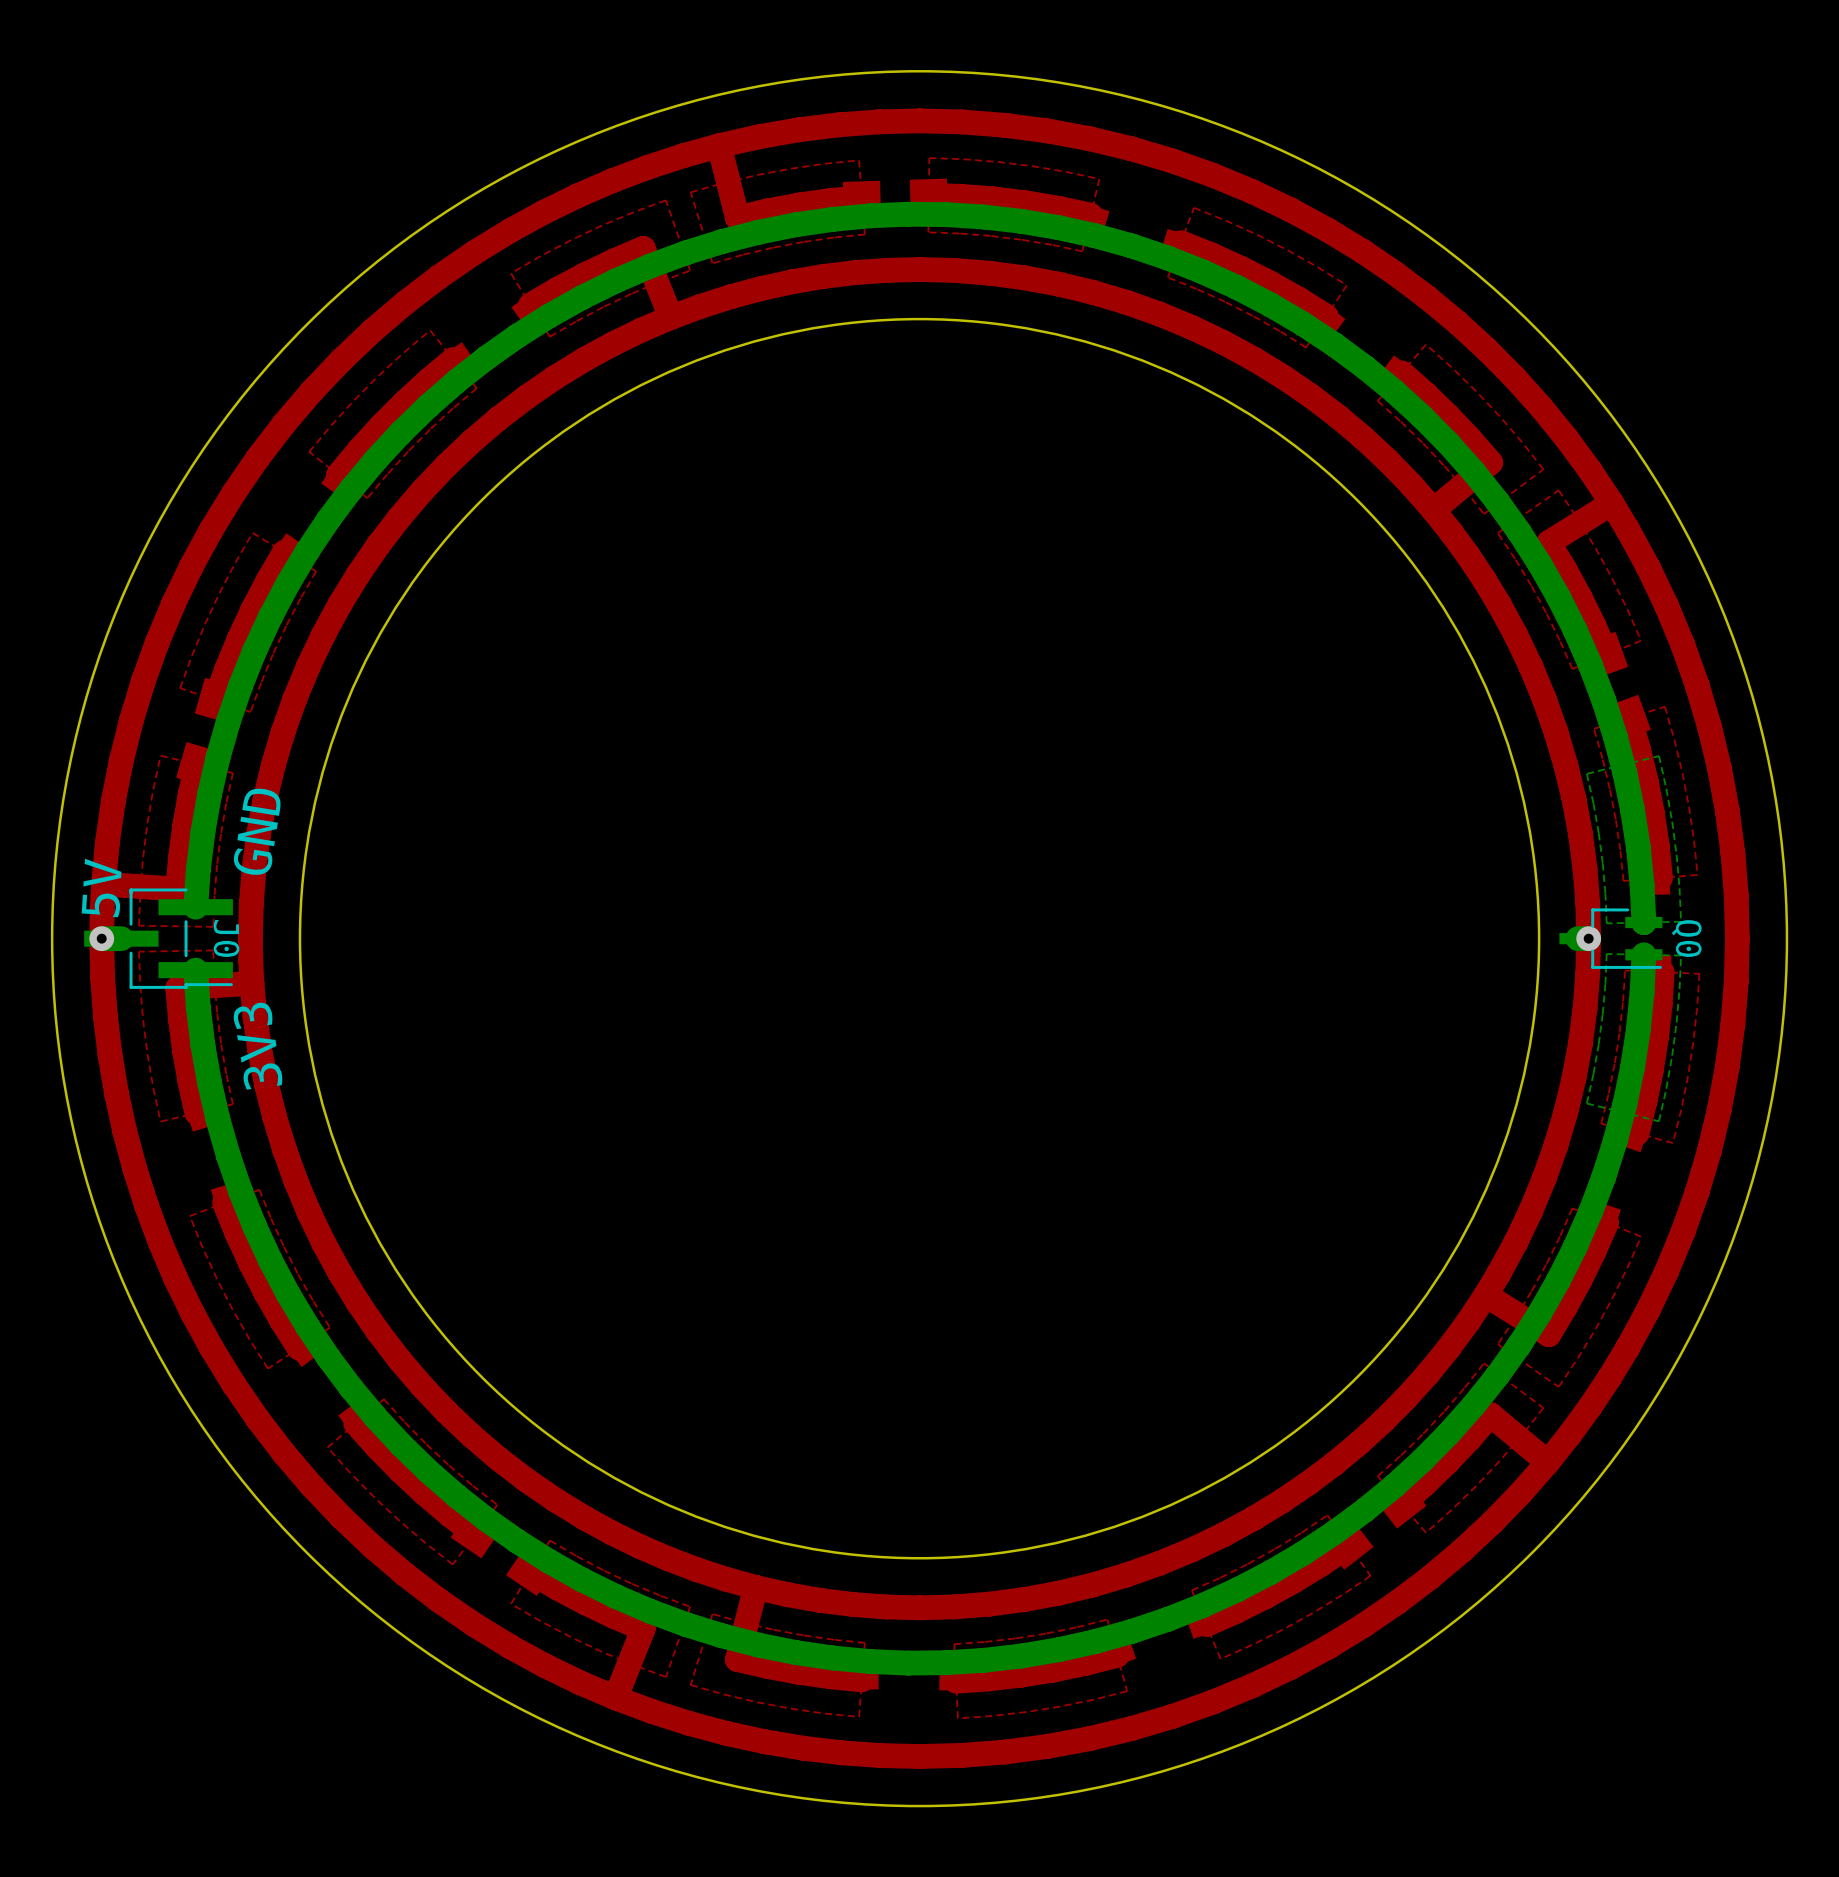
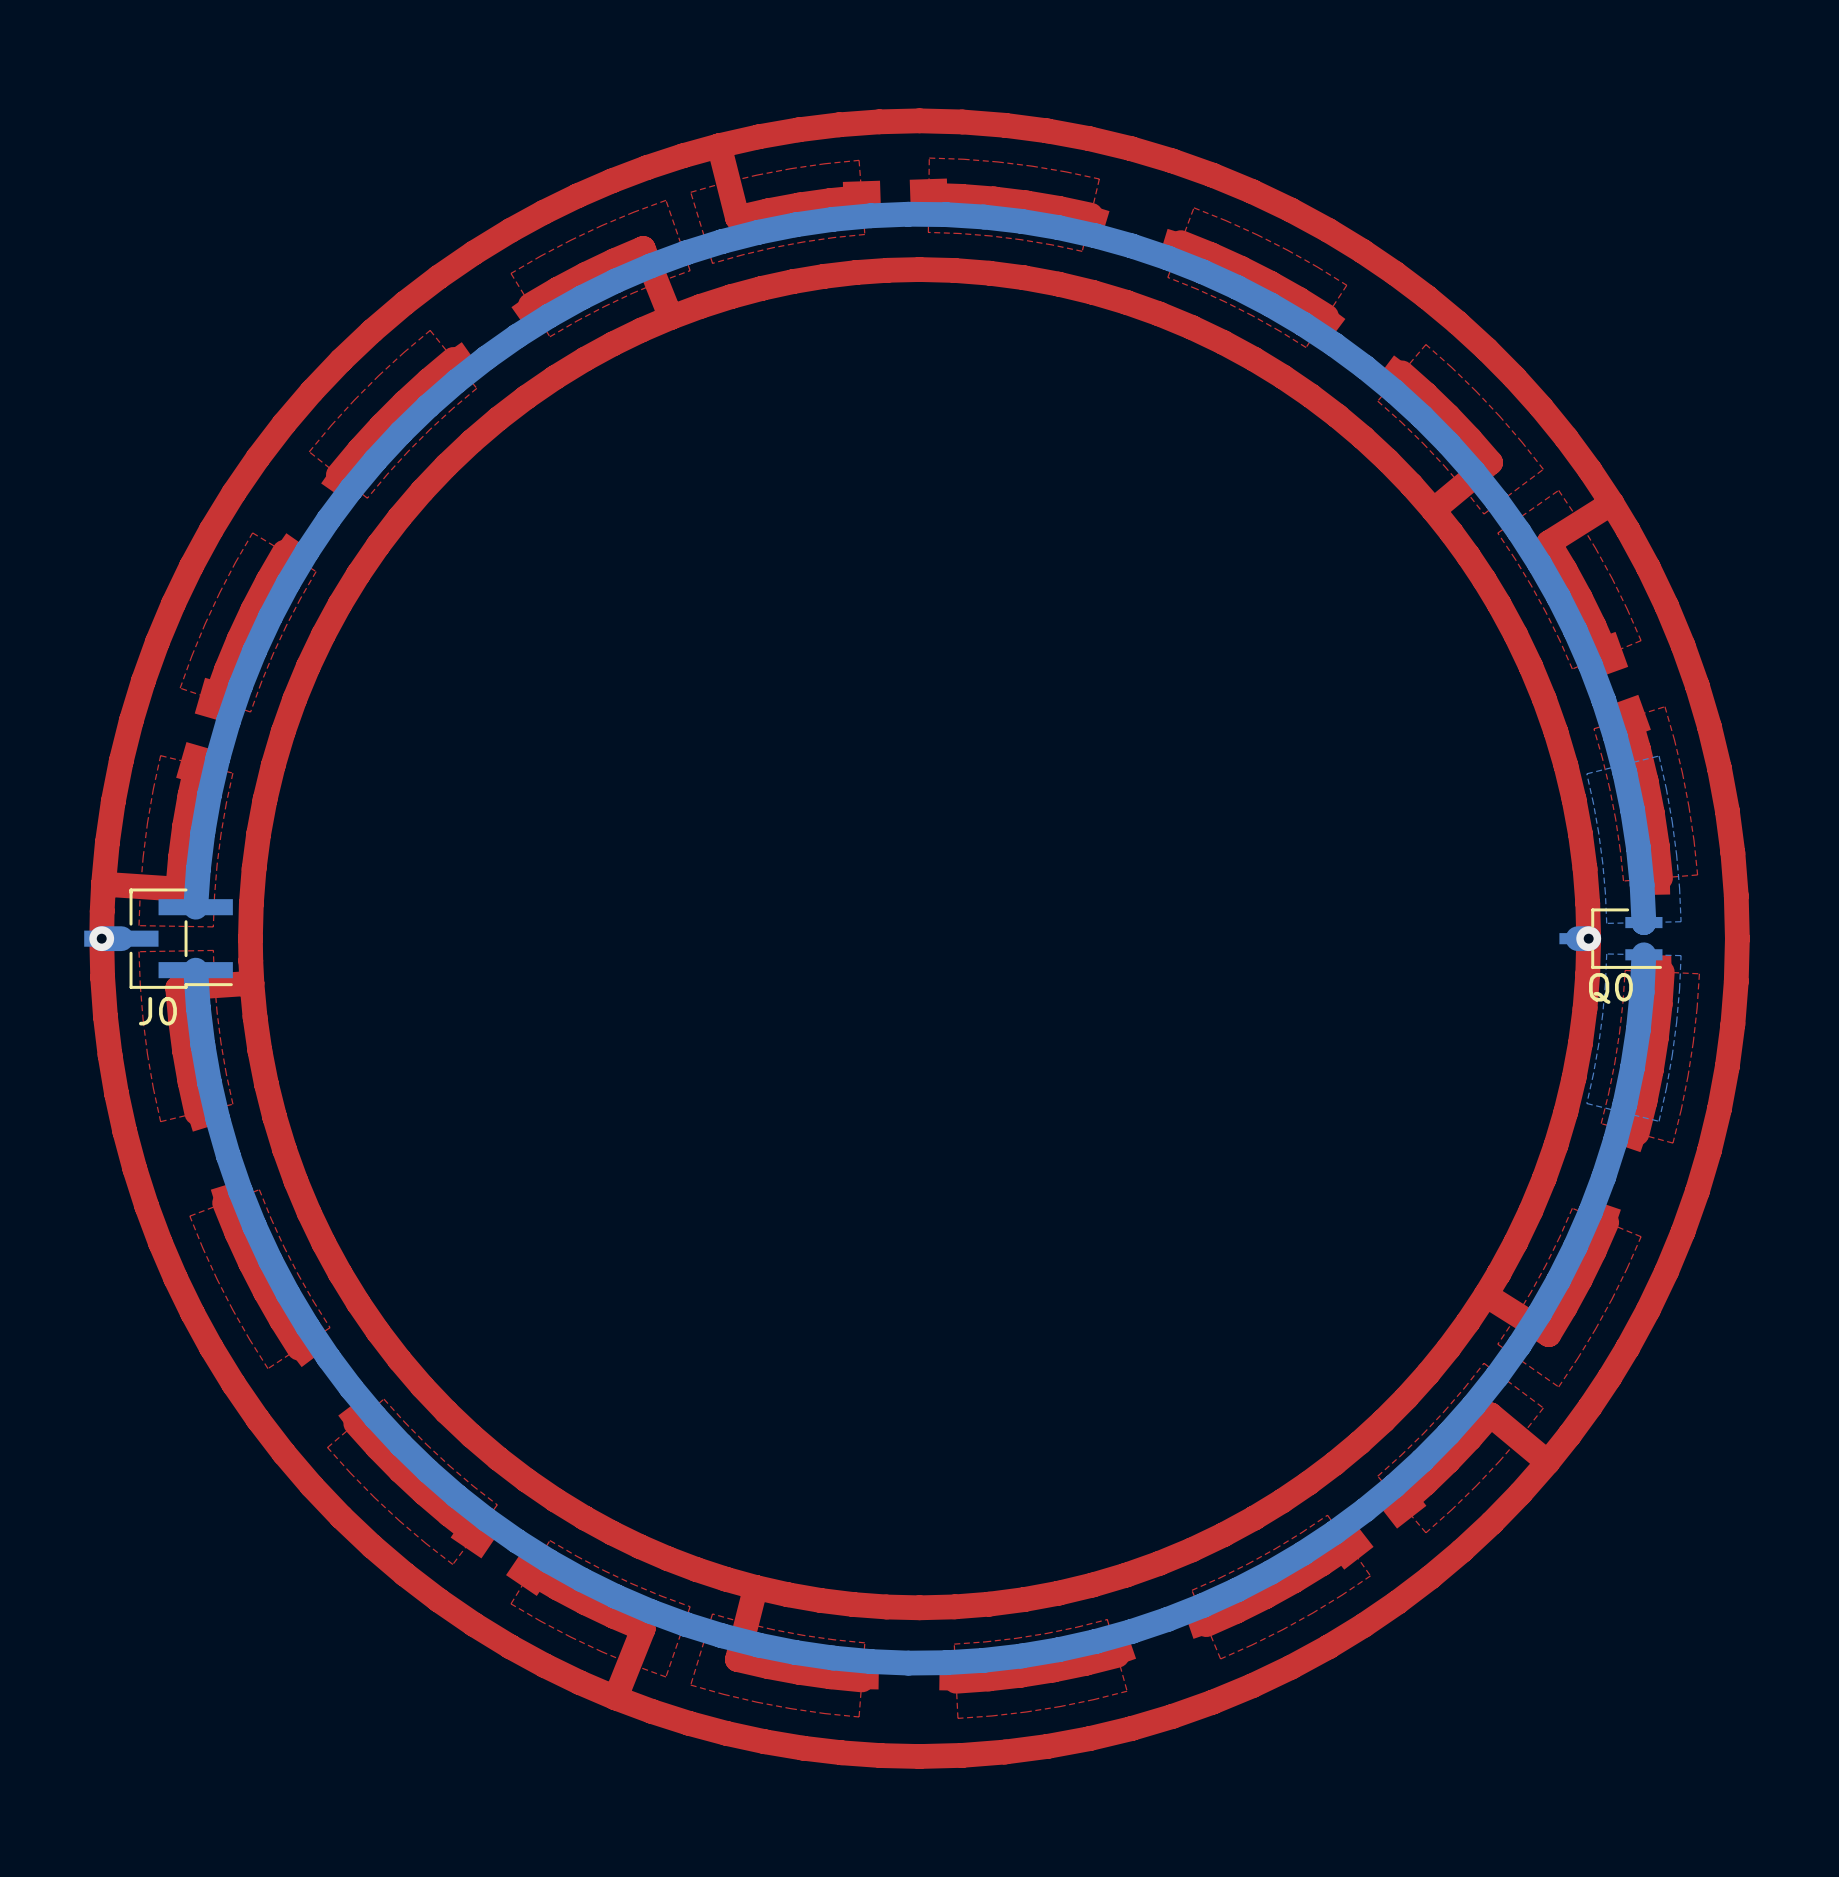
round board edge: [50, 70, 1789, 1808] -> none
round board edge: [298, 317, 1541, 1560] -> none
text: GND (257, 831) -> none
text: 5V (101, 888) -> none
J0 name rotation: 0° (226, 938) -> 90° counterclockwise (157, 1011)
J0 name position: J0 (226, 938) -> J0 (157, 1011)
Q0 name rotation: 0° (1686, 938) -> 90° counterclockwise (1610, 988)
Q0 name position: Q0 (1686, 938) -> Q0 (1610, 988)
text: 3V3 (257, 1045) -> none

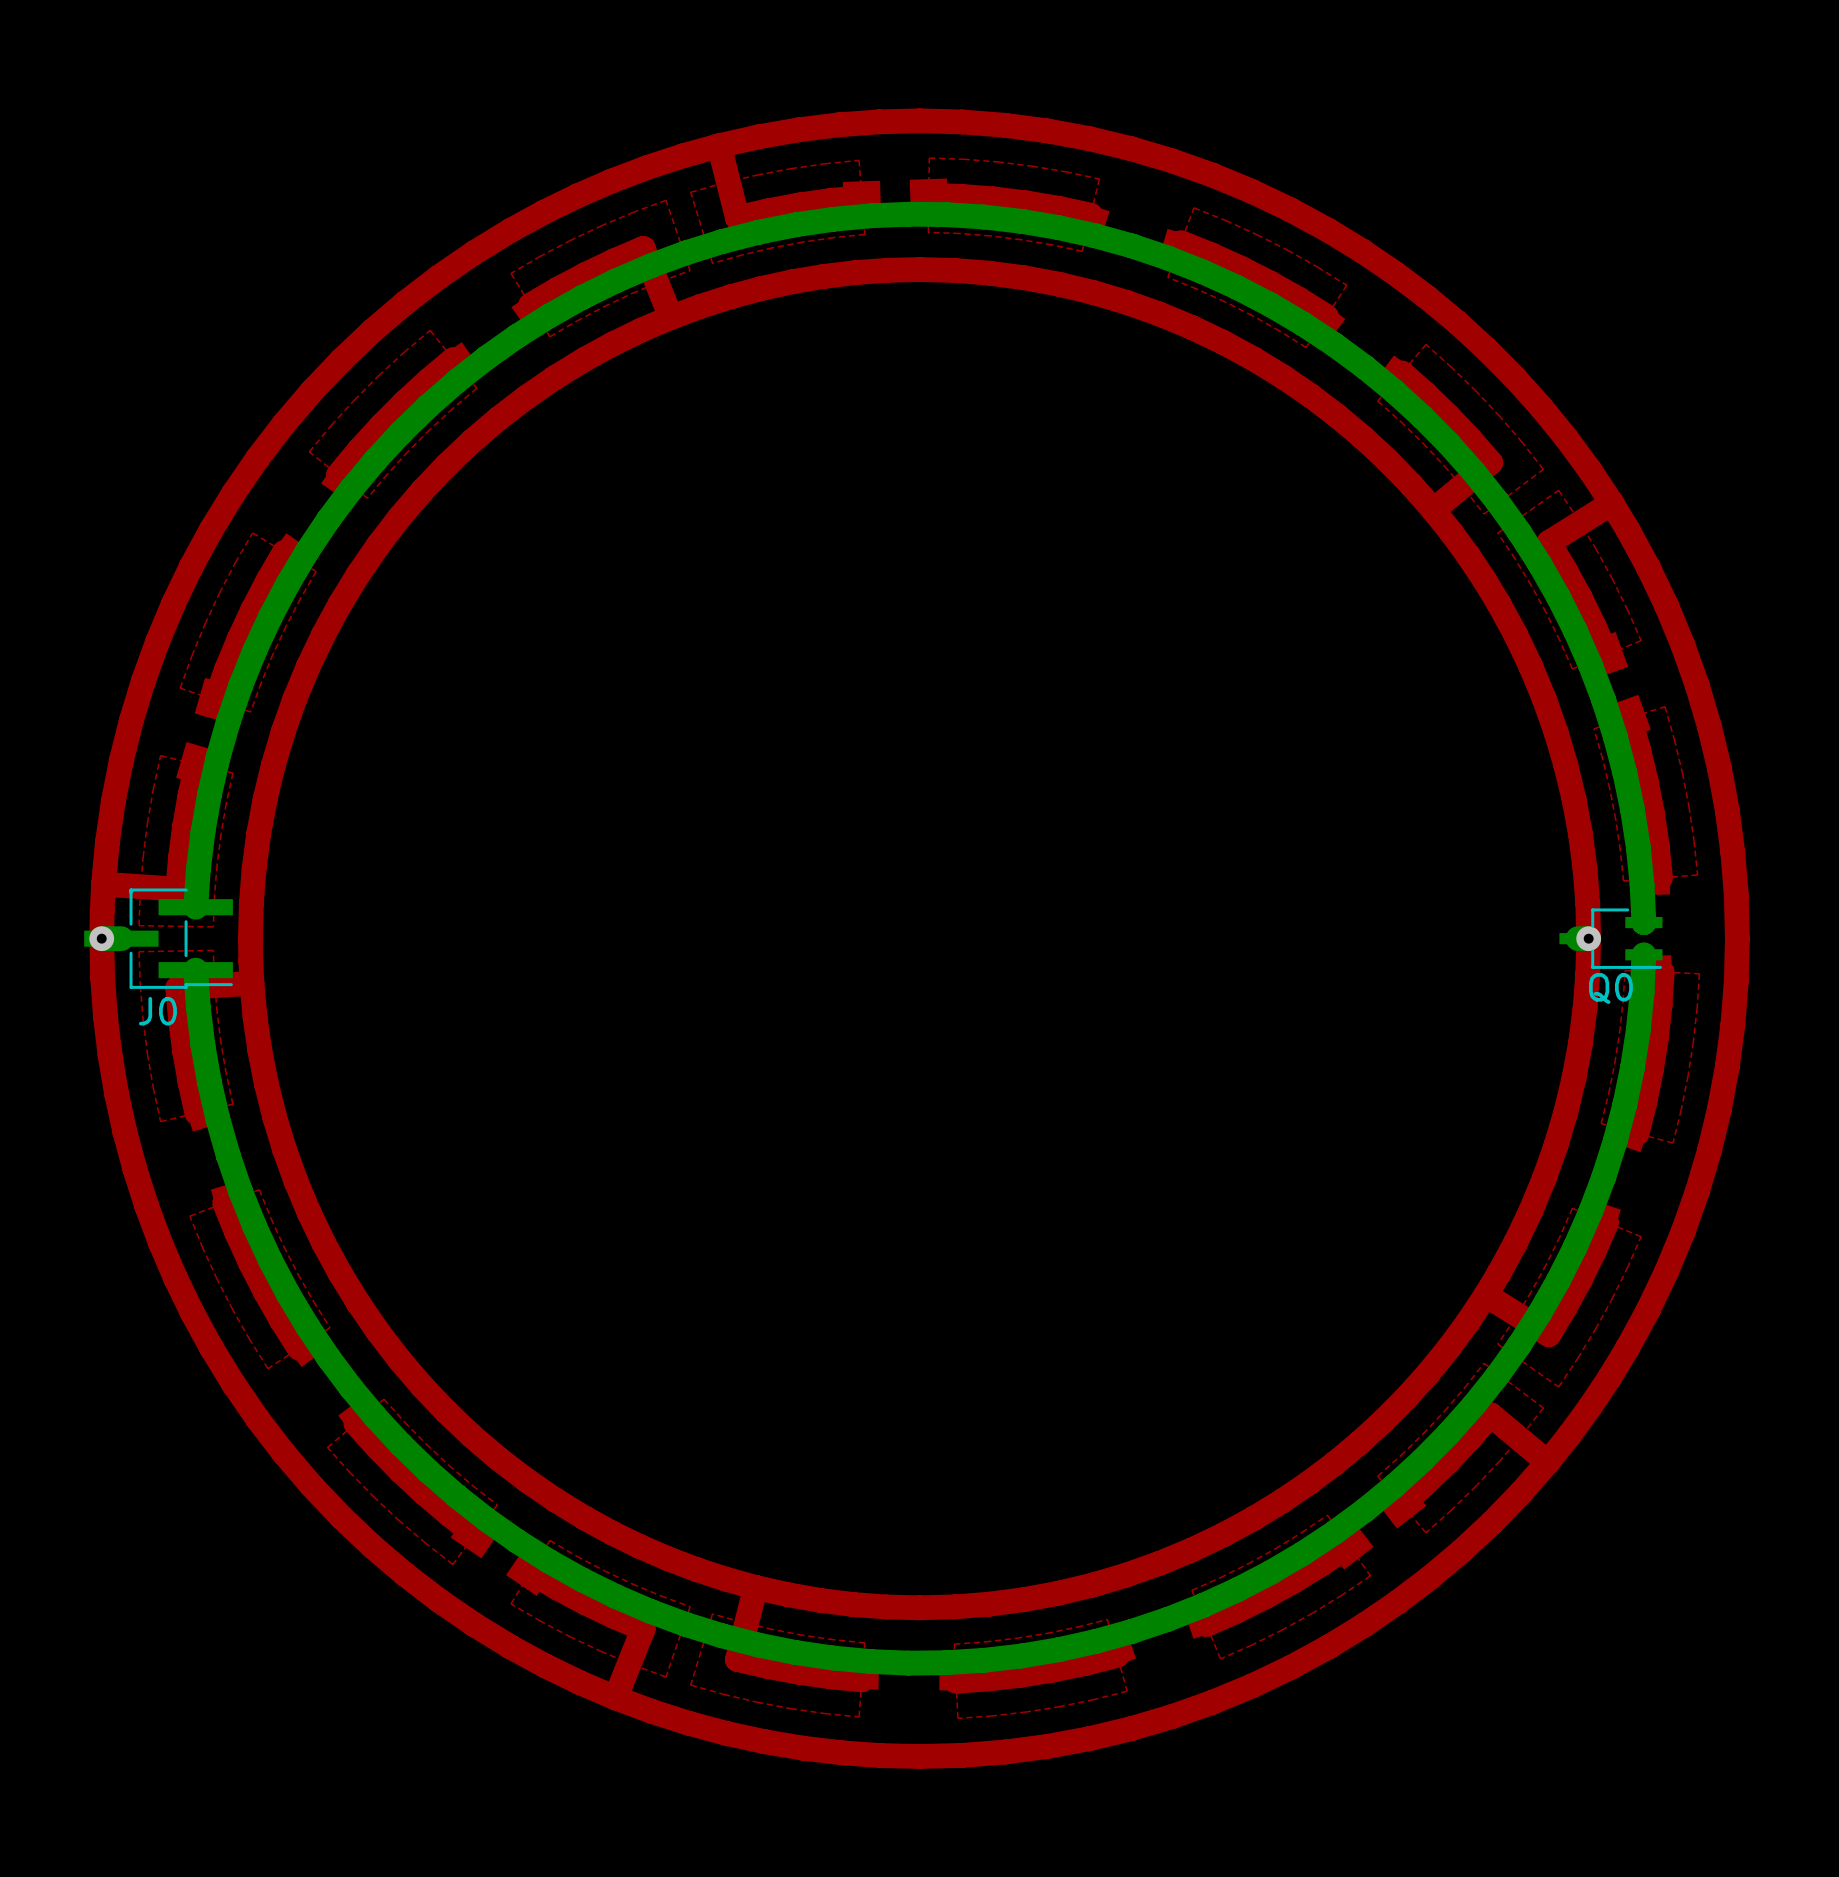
bottom zone outline: (1659, 756) (1586, 773) (1598, 833) (1606, 923) (1681, 921) (1672, 821) (1659, 756) -> none
bottom zone outline: (1606, 953) (1598, 1044) (1586, 1103) (1659, 1121) (1672, 1055) (1681, 955) (1606, 953) -> none

